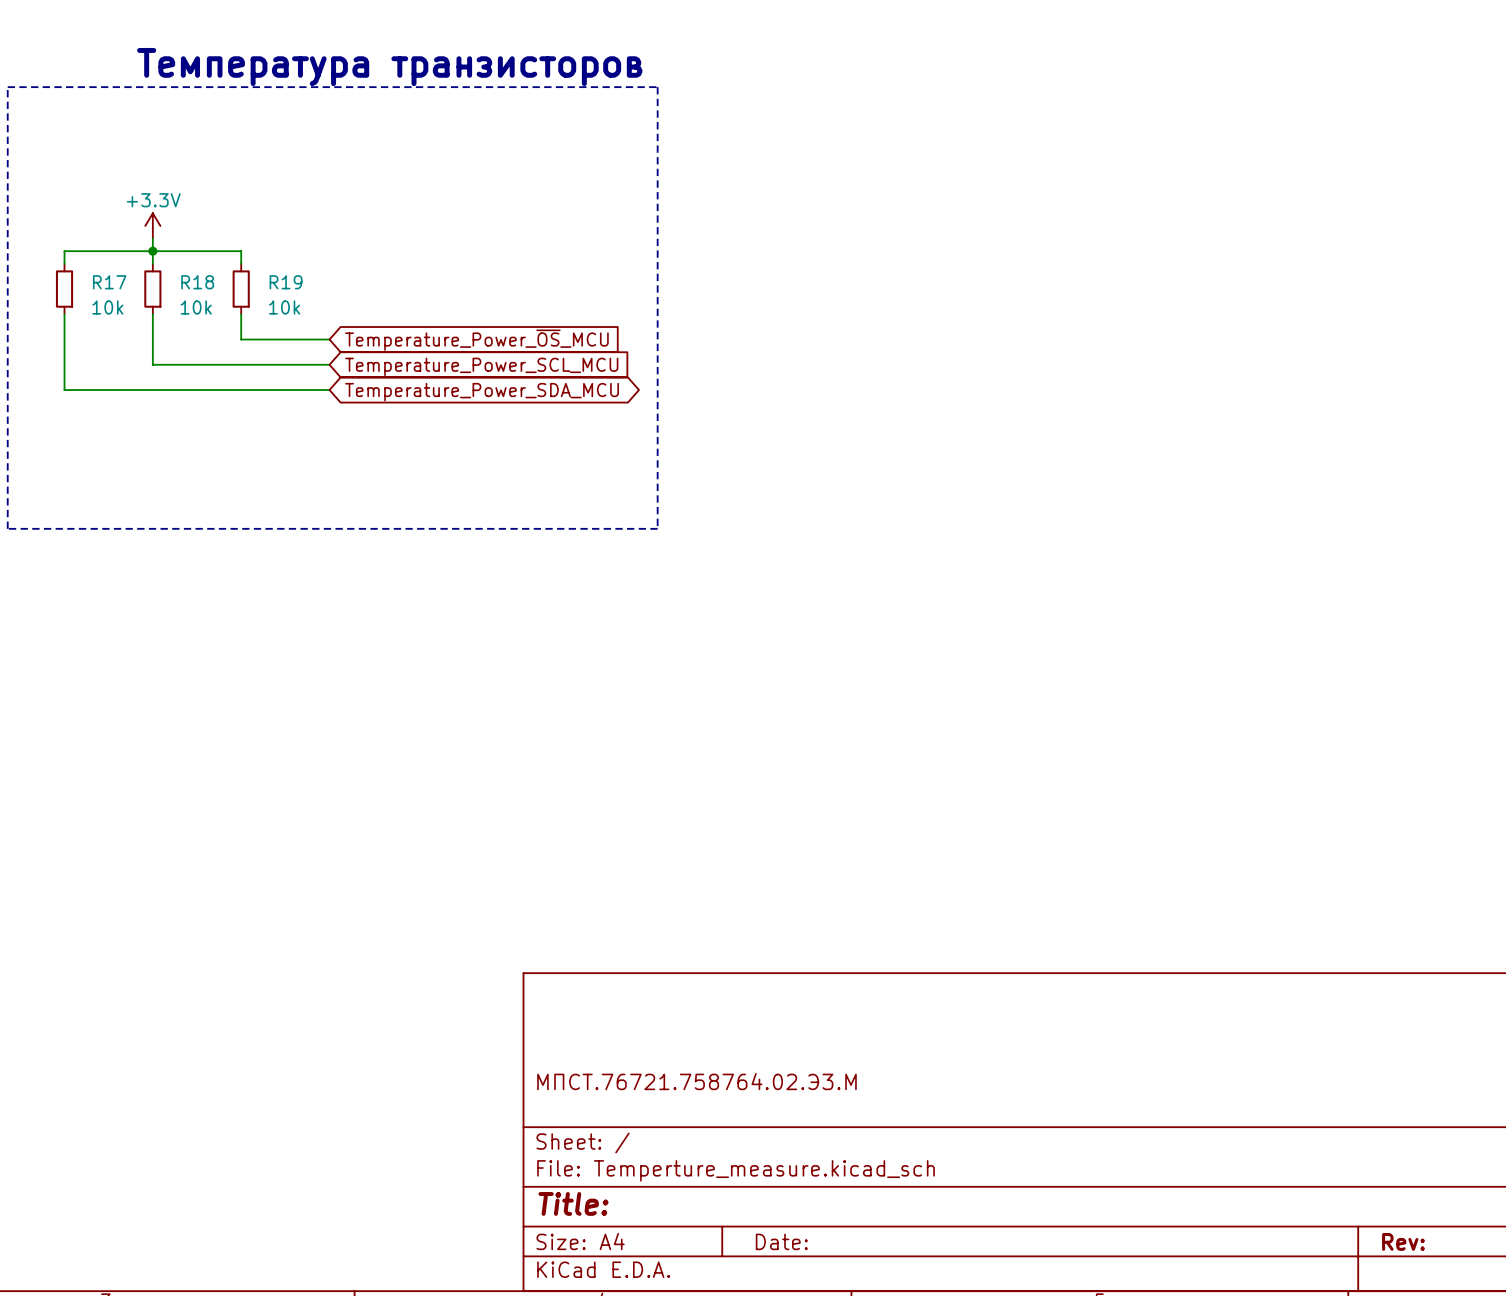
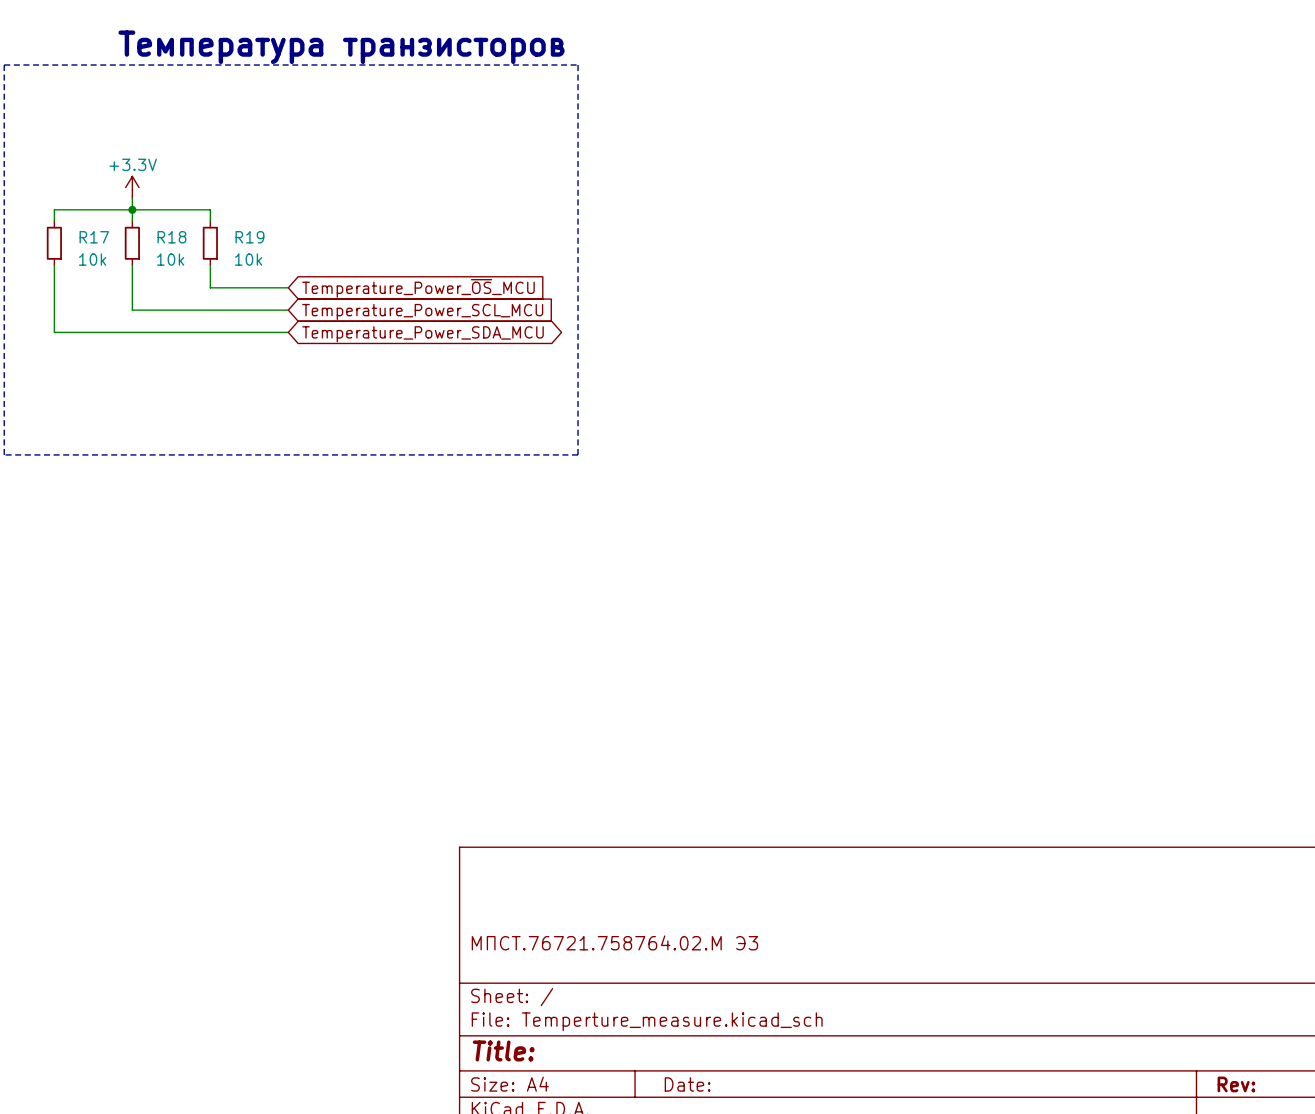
title block: МПСТ.76721.758764.02.Э3.М (696, 1081) -> МПСТ.76721.758764.02.М Э3 (614, 942)

